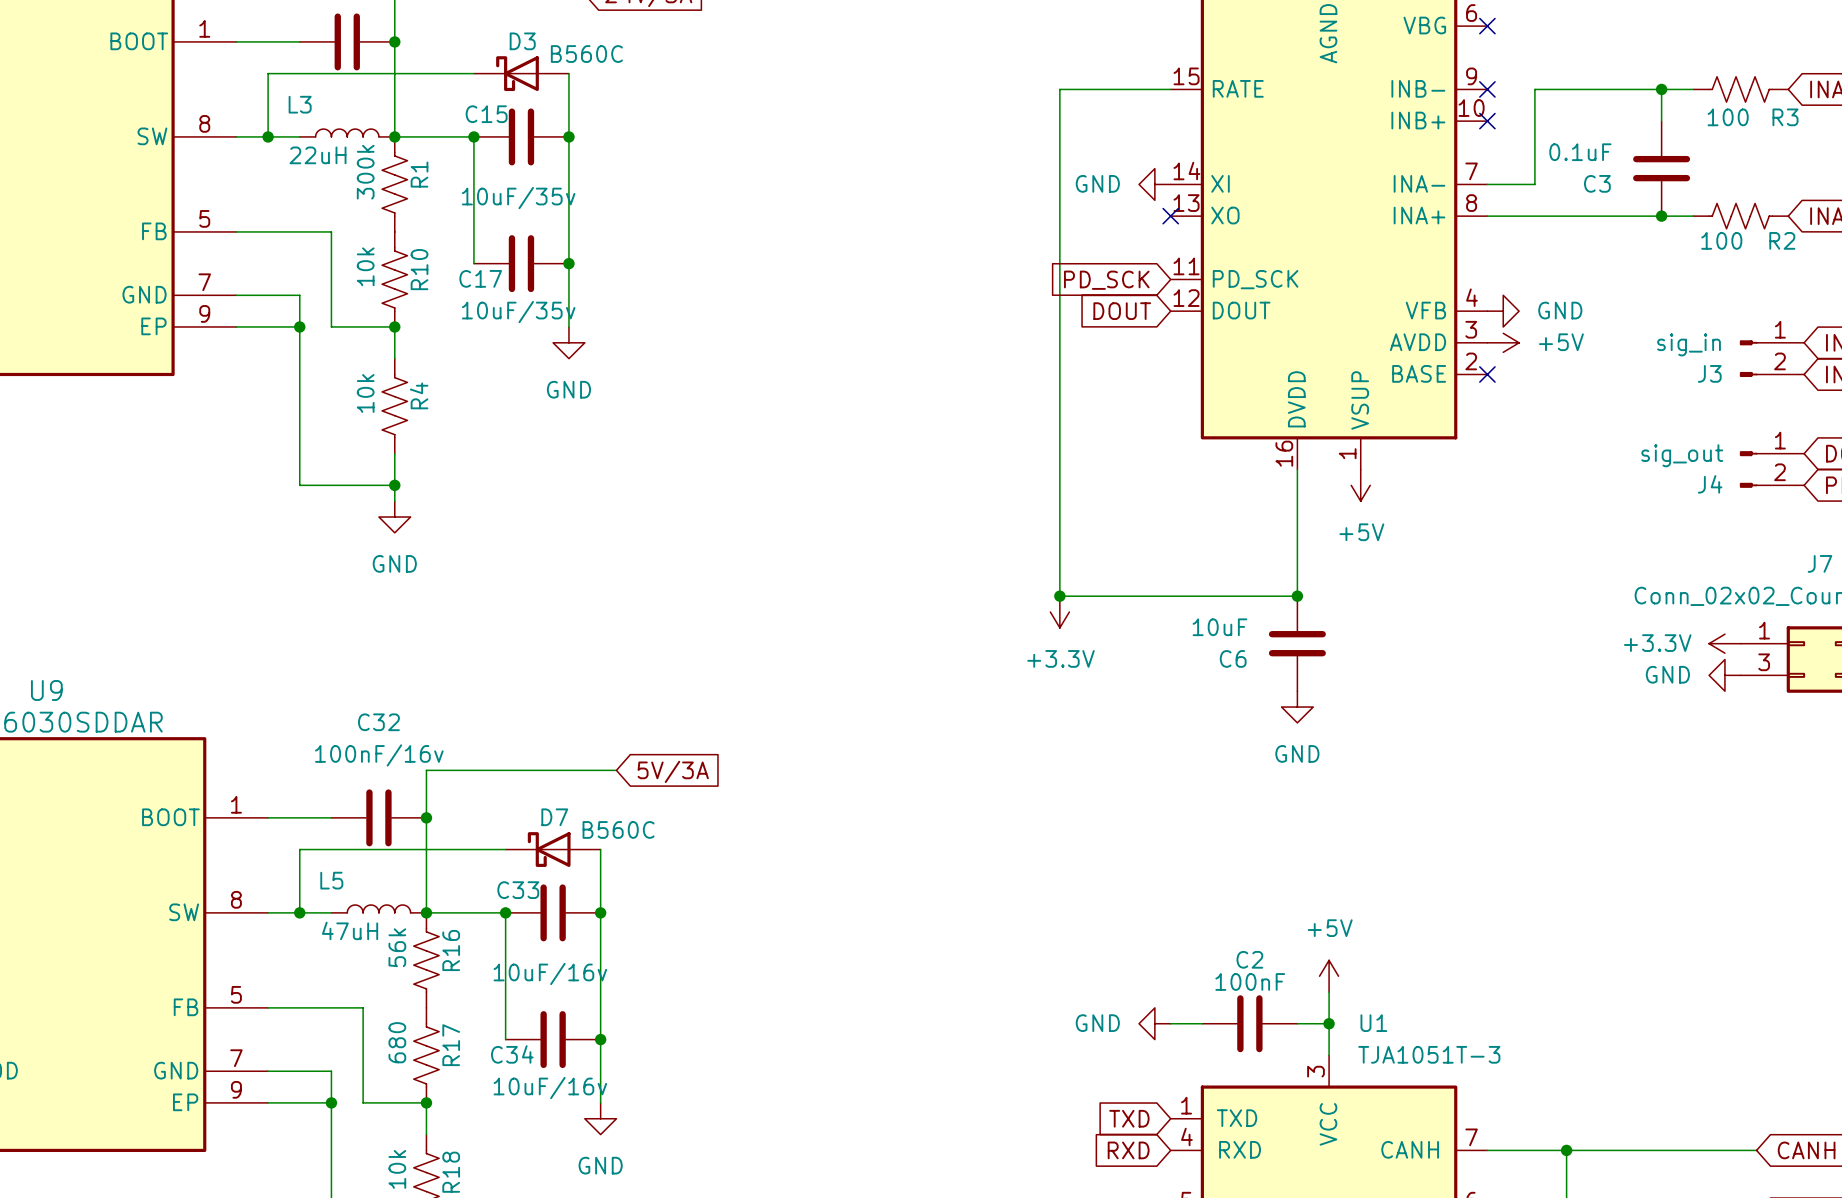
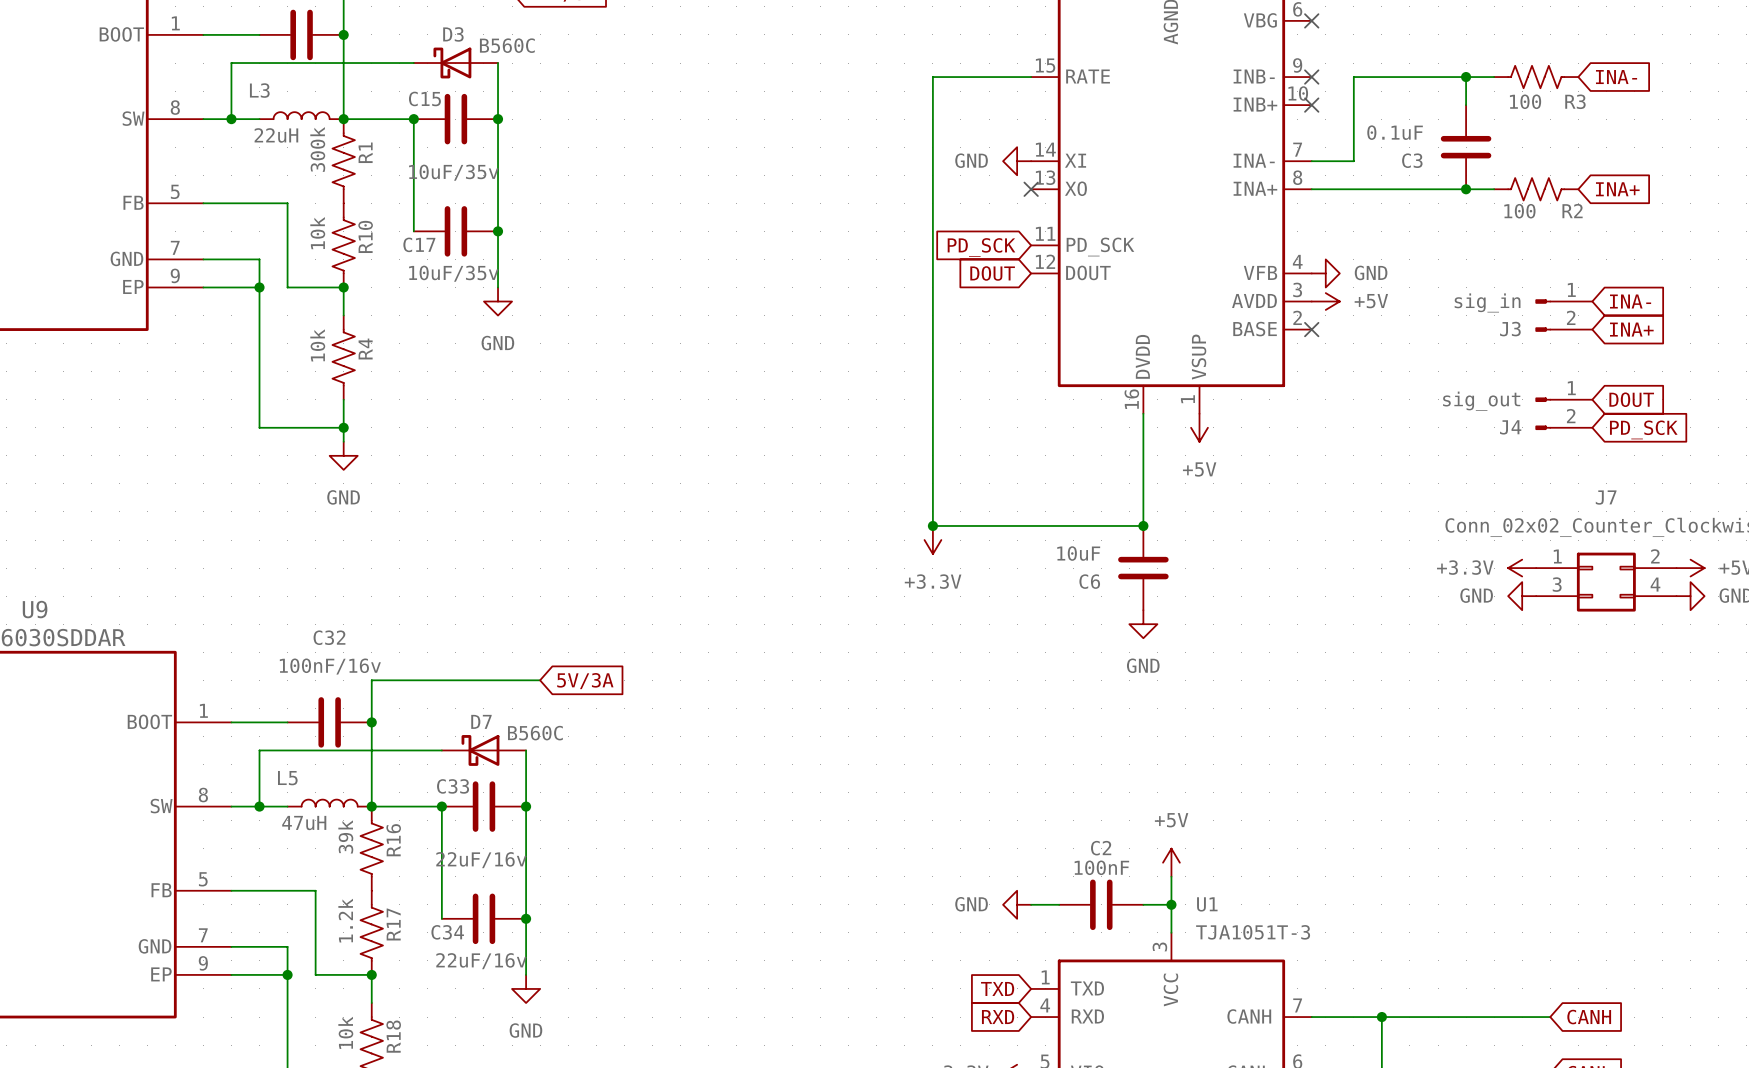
R16 value: 56k (397, 947) -> 39k (345, 836)
C33 value: 10uF/16v (550, 973) -> 22uF/16v (481, 860)
R17 value: 680 (397, 1042) -> 1.2k (345, 920)
C34 value: 10uF/16v (550, 1087) -> 22uF/16v (481, 961)

